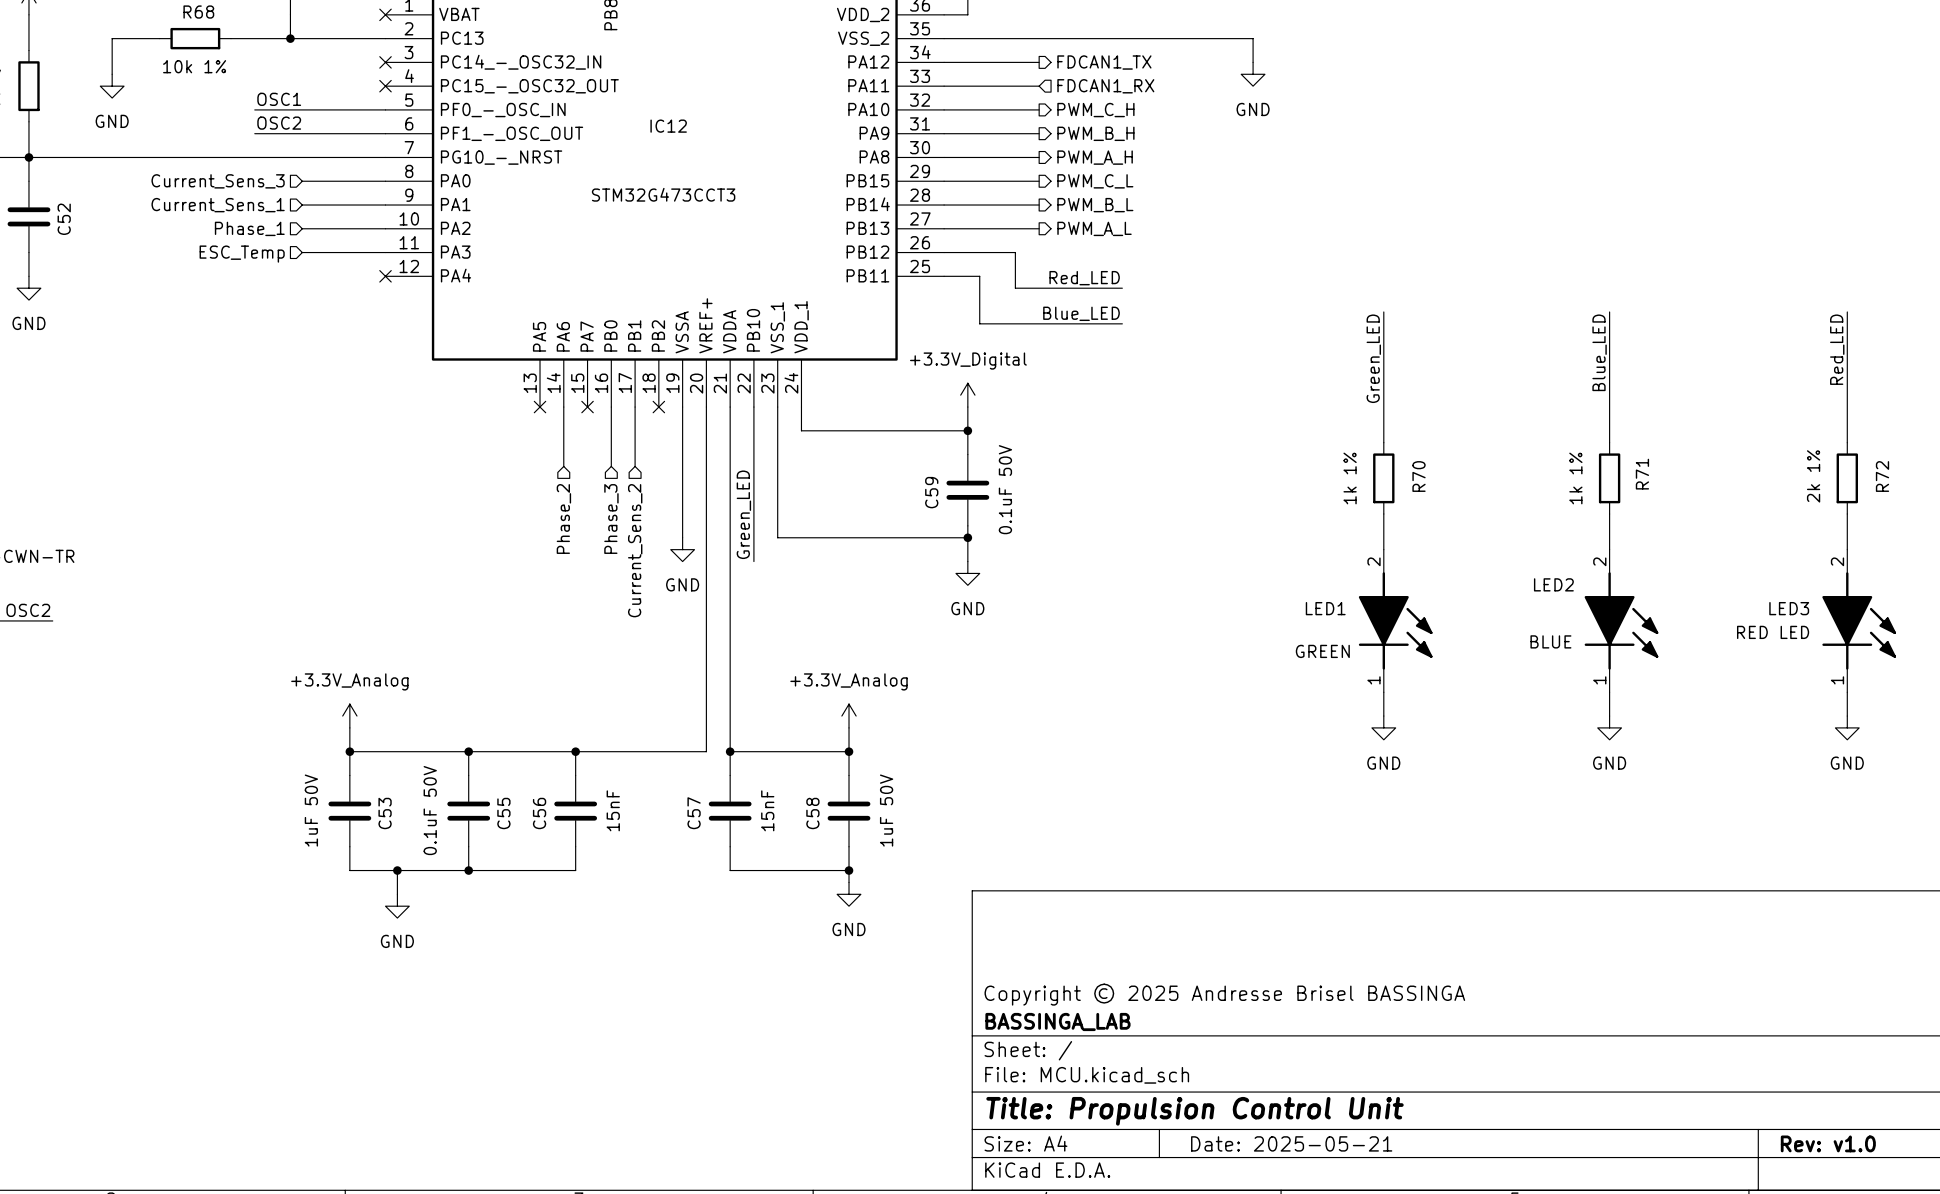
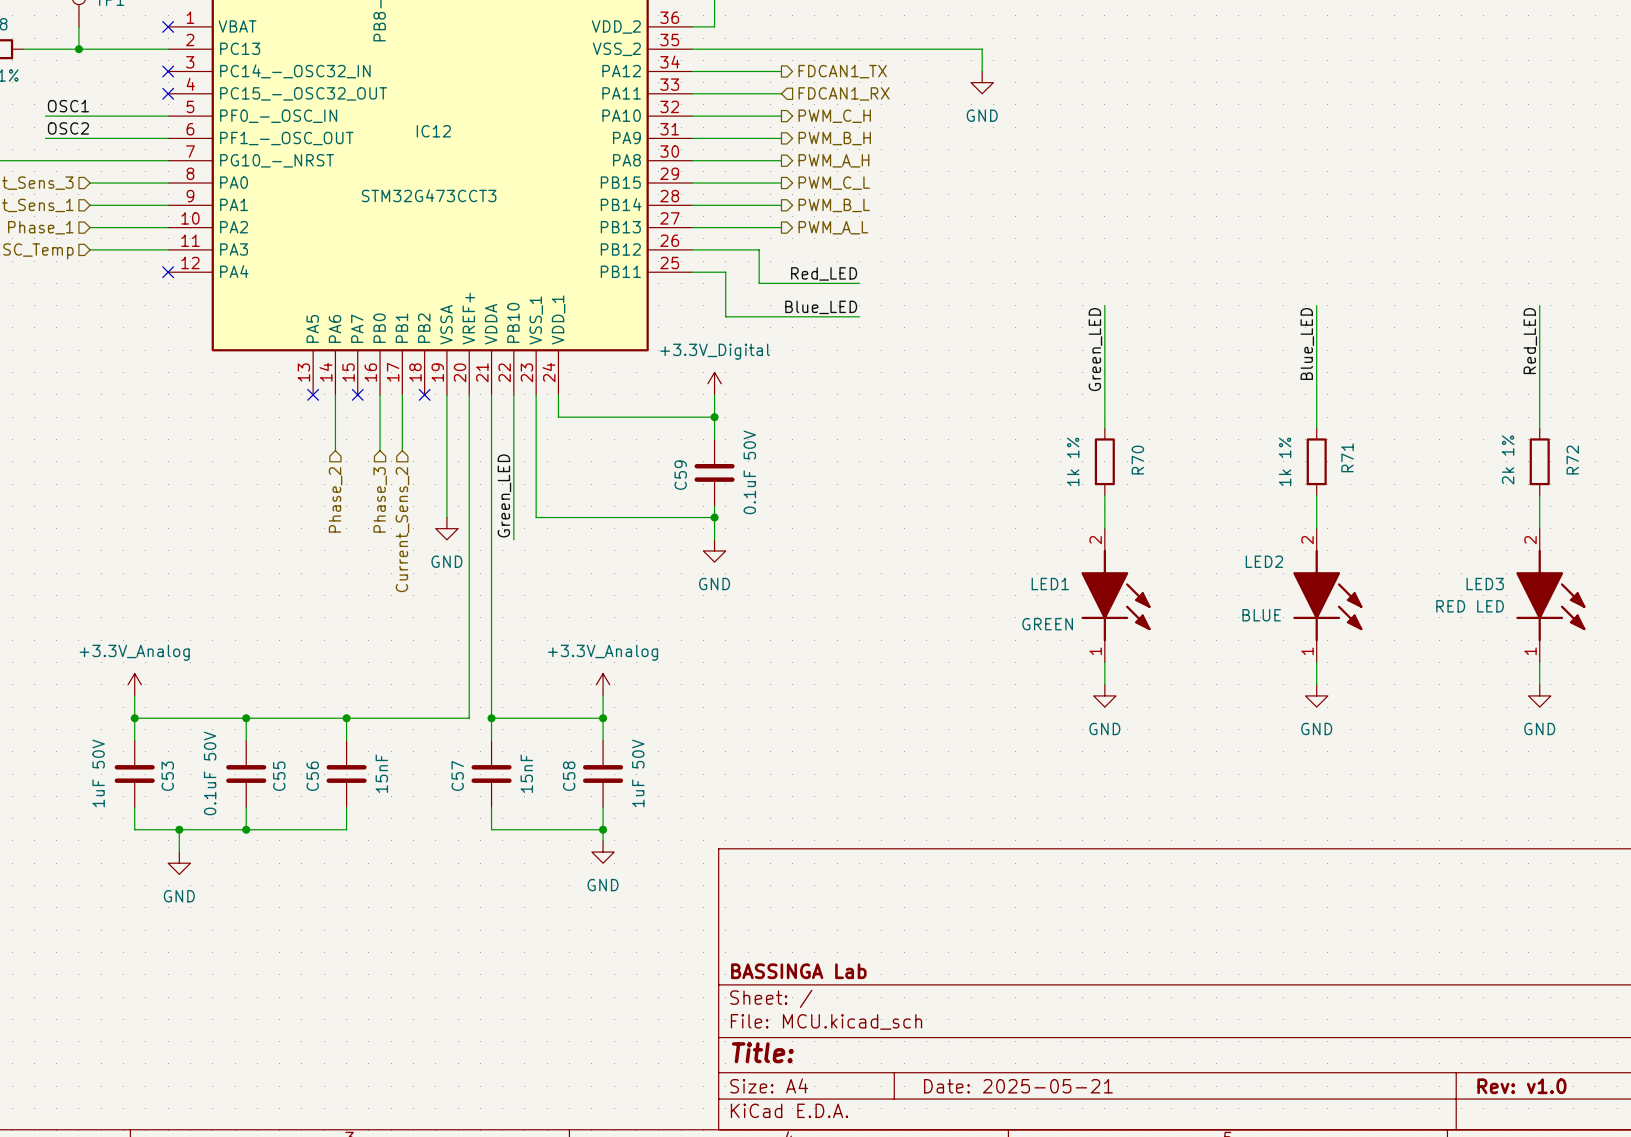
title block: Copyright © 2025 Andresse Brisel BASSINGA (1224, 994) -> none
title block: BASSINGA_LAB (1057, 1021) -> BASSINGA Lab (798, 971)
title block: Title: Propulsion Control Unit (1195, 1111) -> Title: (762, 1052)

